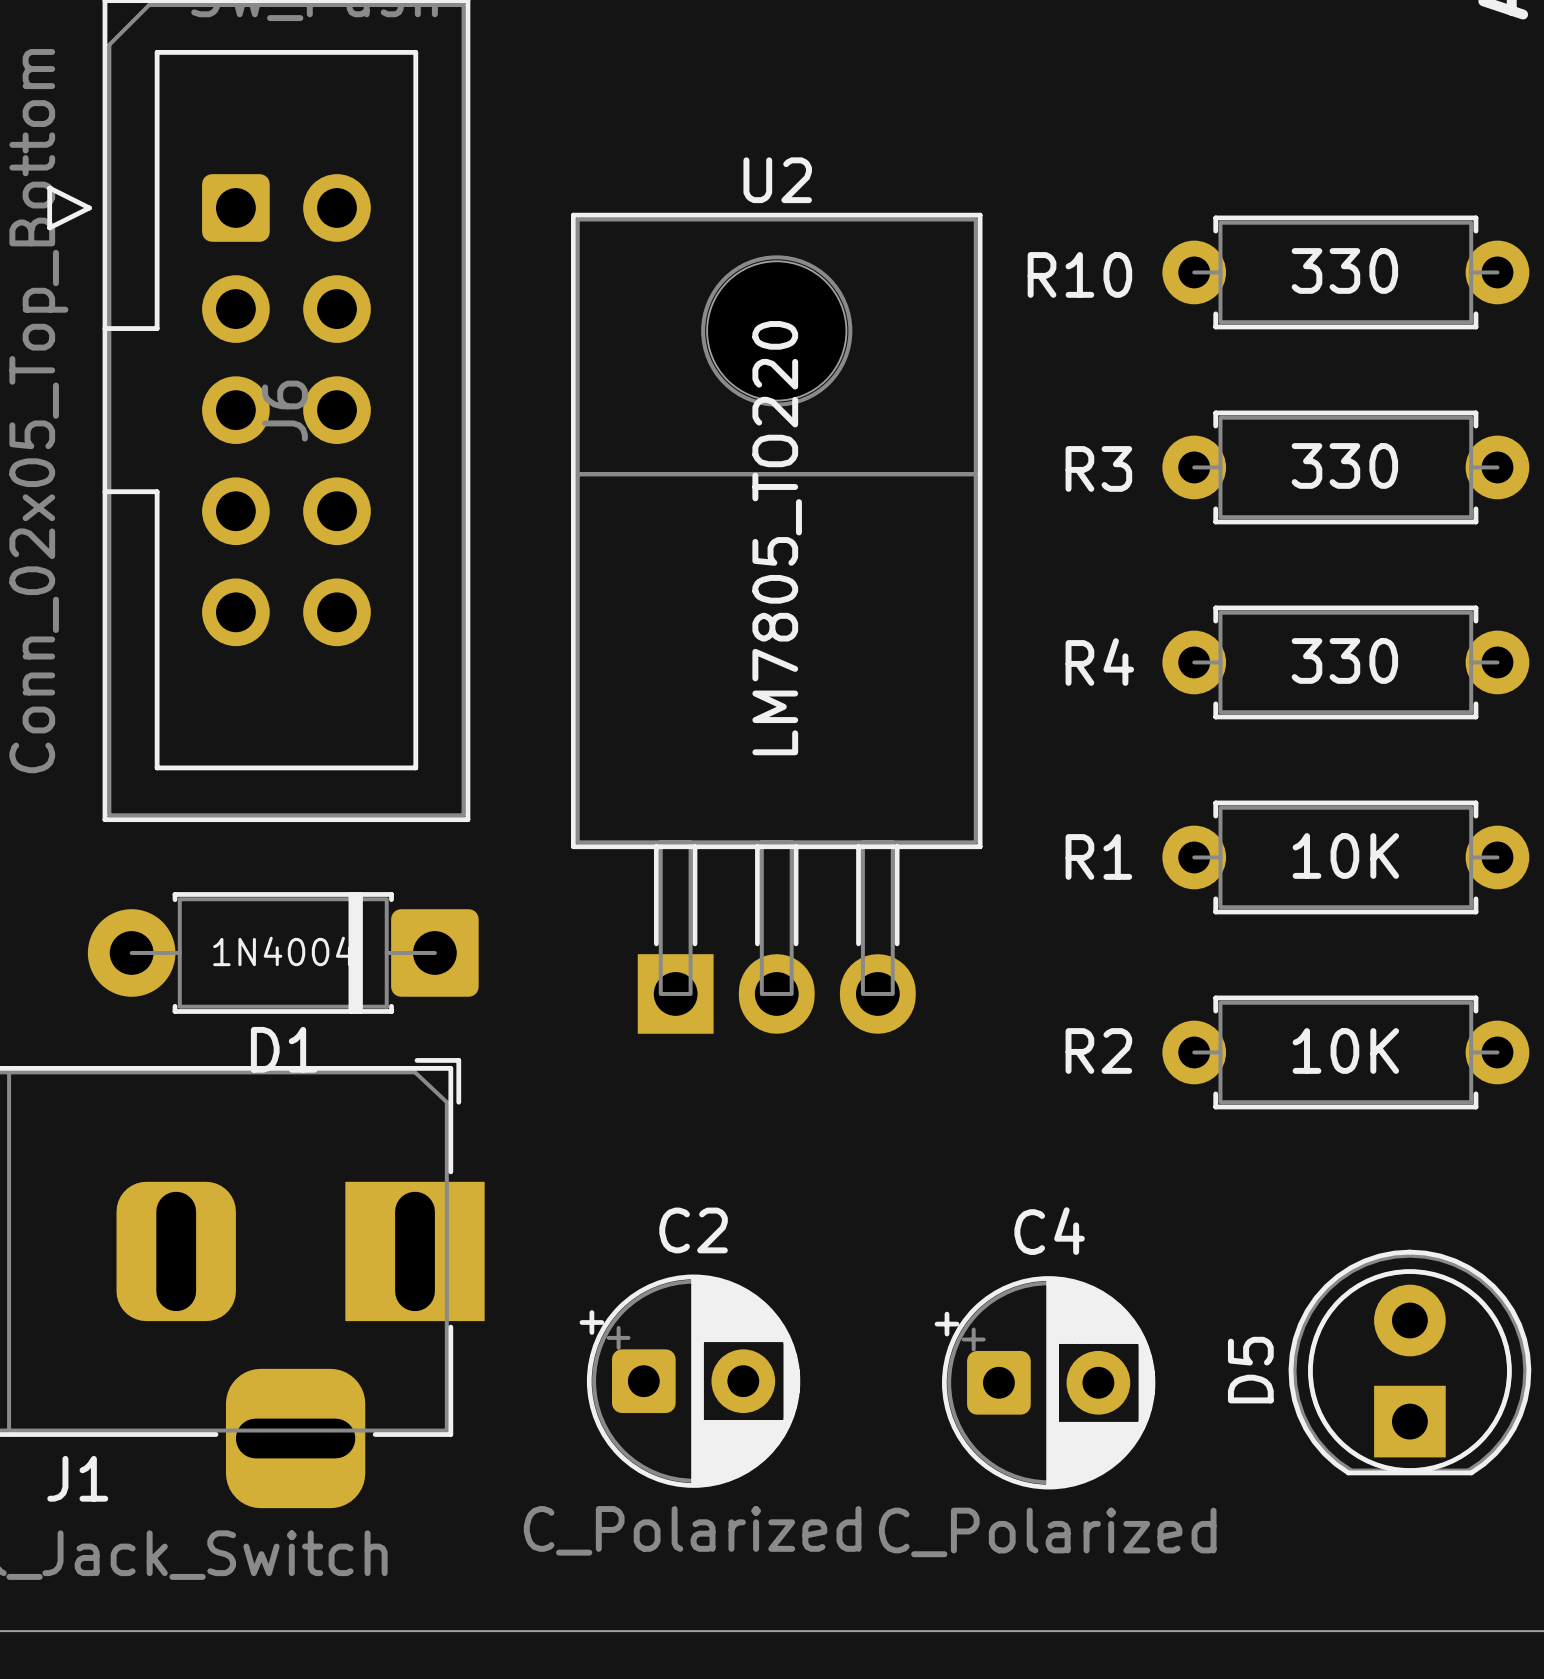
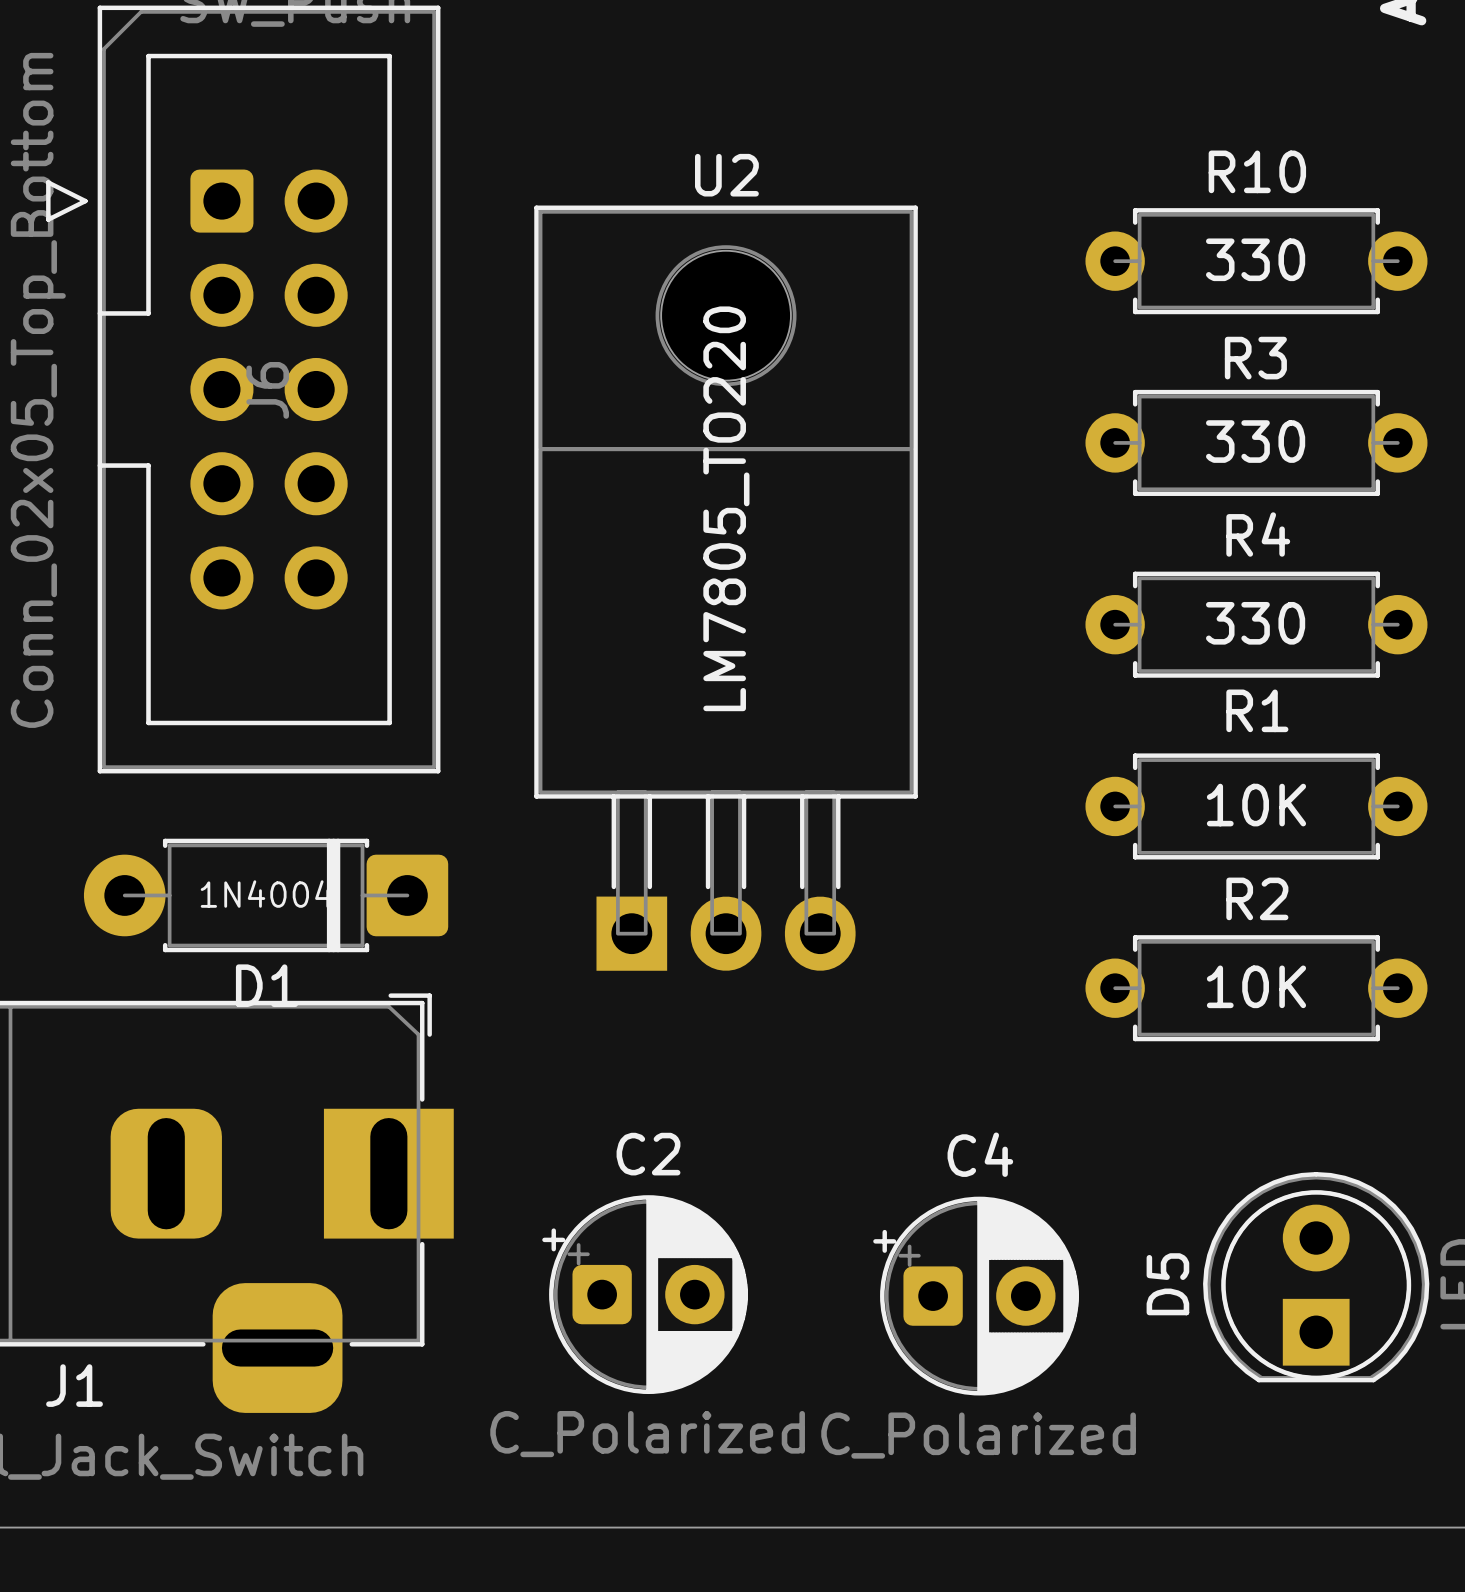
R10 name position: R10 (1079, 274) -> R10 (1257, 171)
R3 name position: R3 (1098, 468) -> R3 (1255, 358)
R4 name position: R4 (1099, 662) -> R4 (1258, 534)
R1 name position: R1 (1098, 856) -> R1 (1257, 710)
R2 name position: R2 (1098, 1050) -> R2 (1257, 898)

